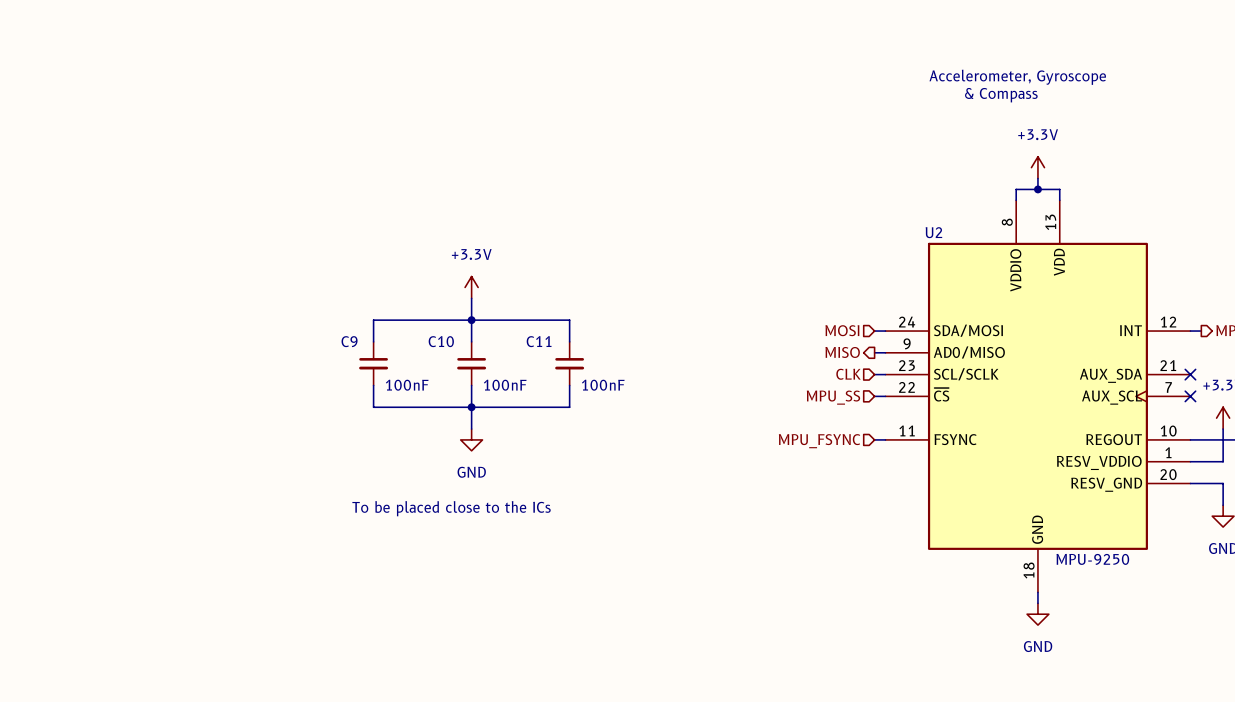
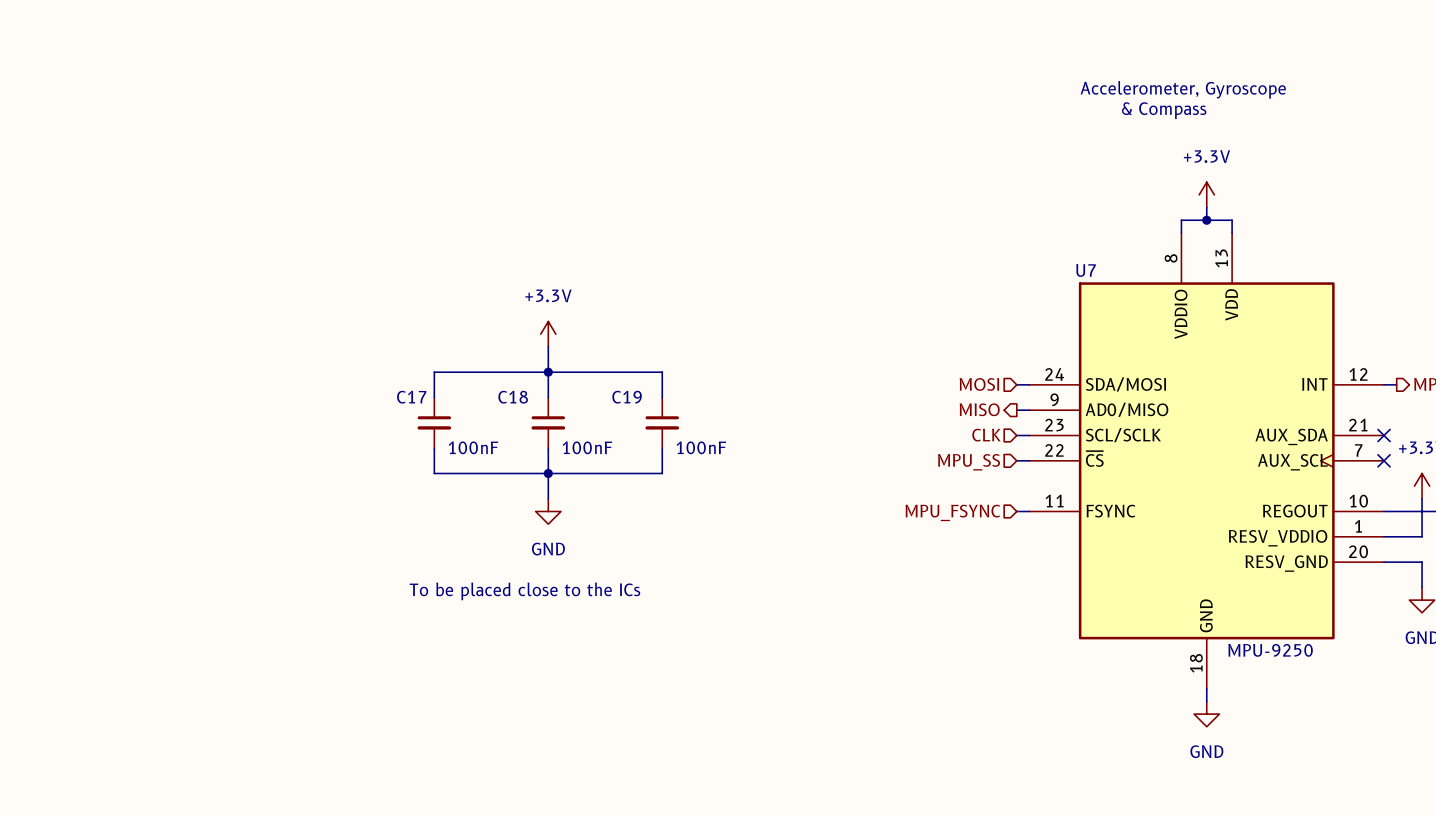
U2 name: U2 (933, 232) -> U7 (1085, 270)
C9 name: C9 (349, 341) -> C17 (411, 397)
C10 name: C10 (441, 341) -> C18 (513, 397)
C11 name: C11 (539, 341) -> C19 (627, 397)

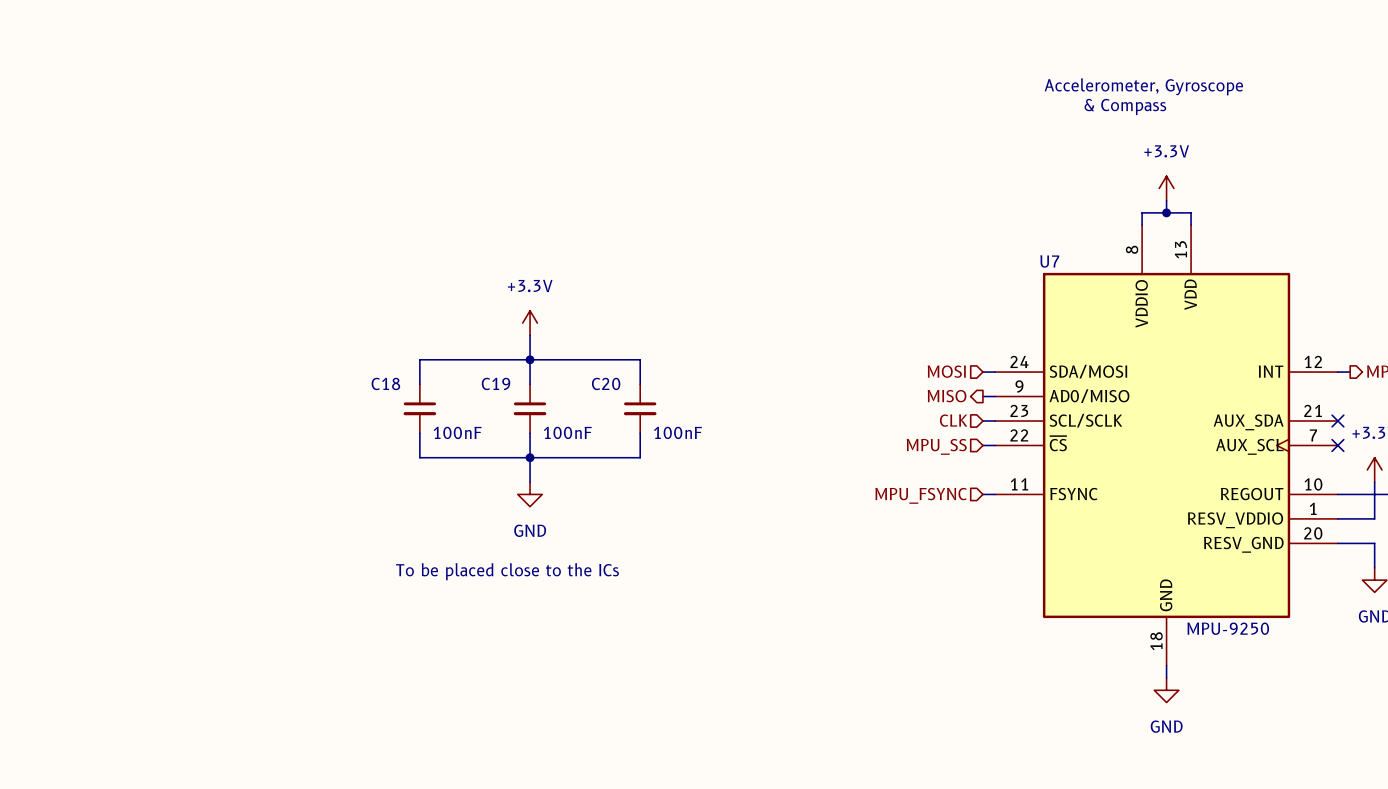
C17 name: C17 (411, 397) -> C18 (385, 383)
C18 name: C18 (513, 397) -> C19 (496, 383)
C19 name: C19 (627, 397) -> C20 (606, 383)

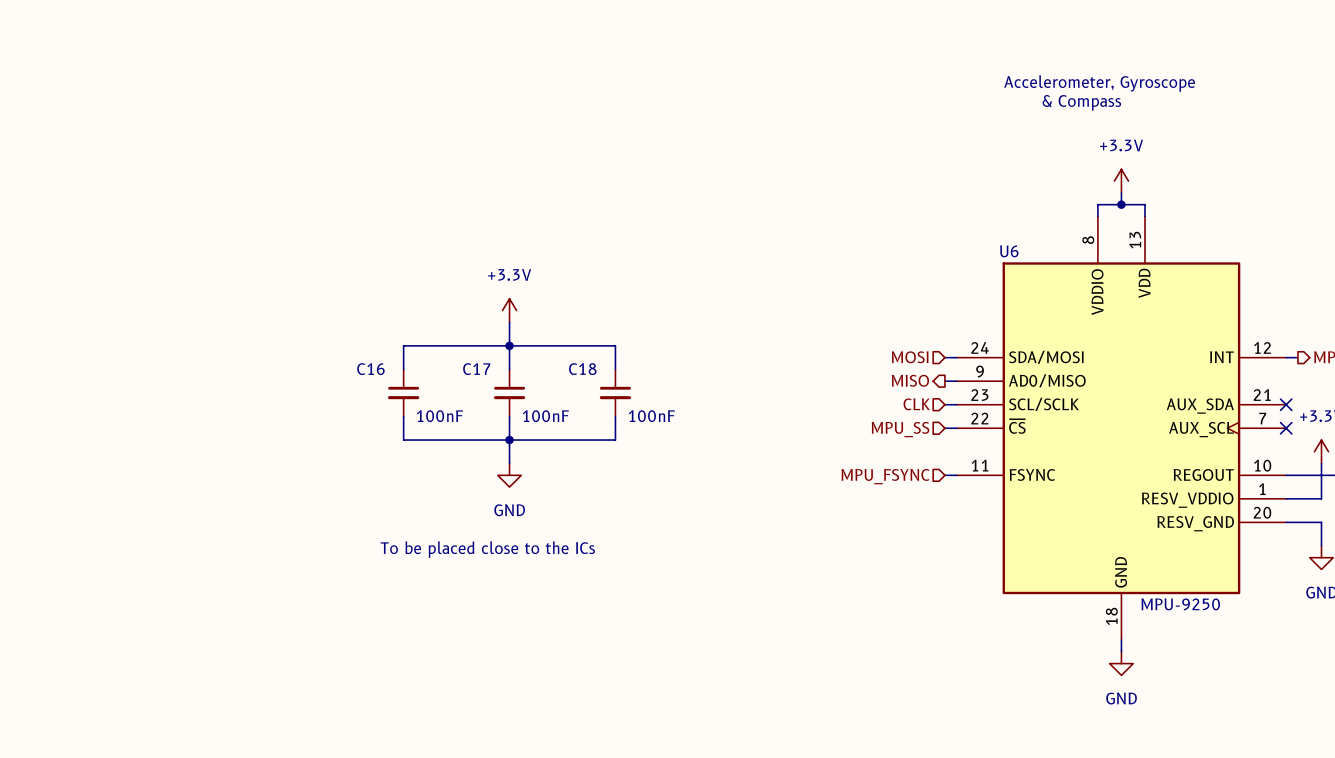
U7 name: U7 (1049, 261) -> U6 (1009, 251)
C18 name: C18 (385, 383) -> C16 (370, 369)
C19 name: C19 (496, 383) -> C17 (476, 369)
C20 name: C20 (606, 383) -> C18 (582, 369)

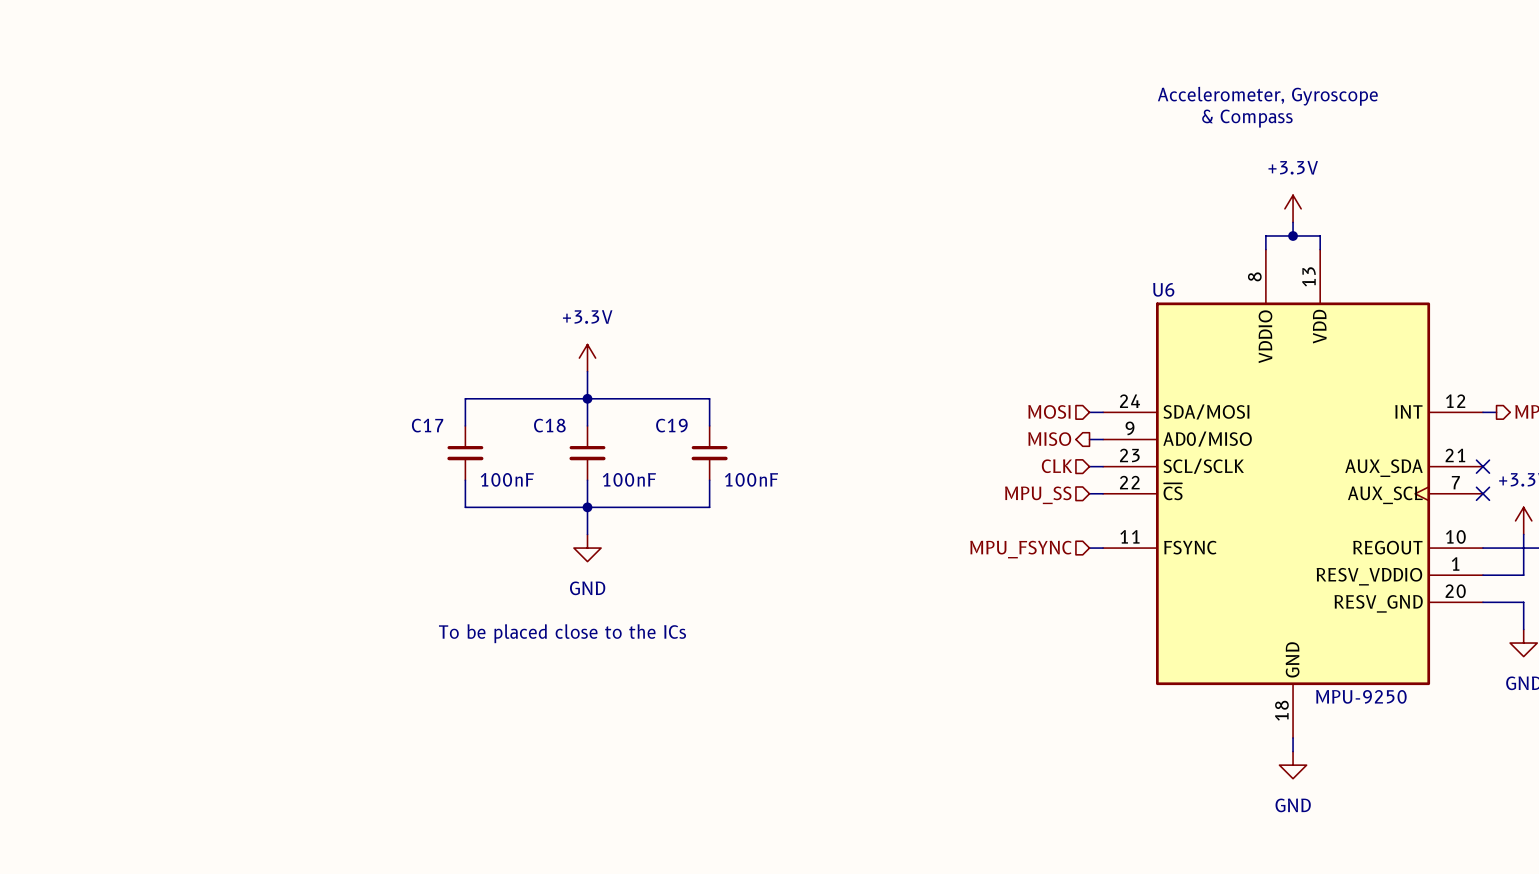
C16 name: C16 (370, 369) -> C17 (427, 425)
C17 name: C17 (476, 369) -> C18 (549, 425)
C18 name: C18 (582, 369) -> C19 (671, 425)

